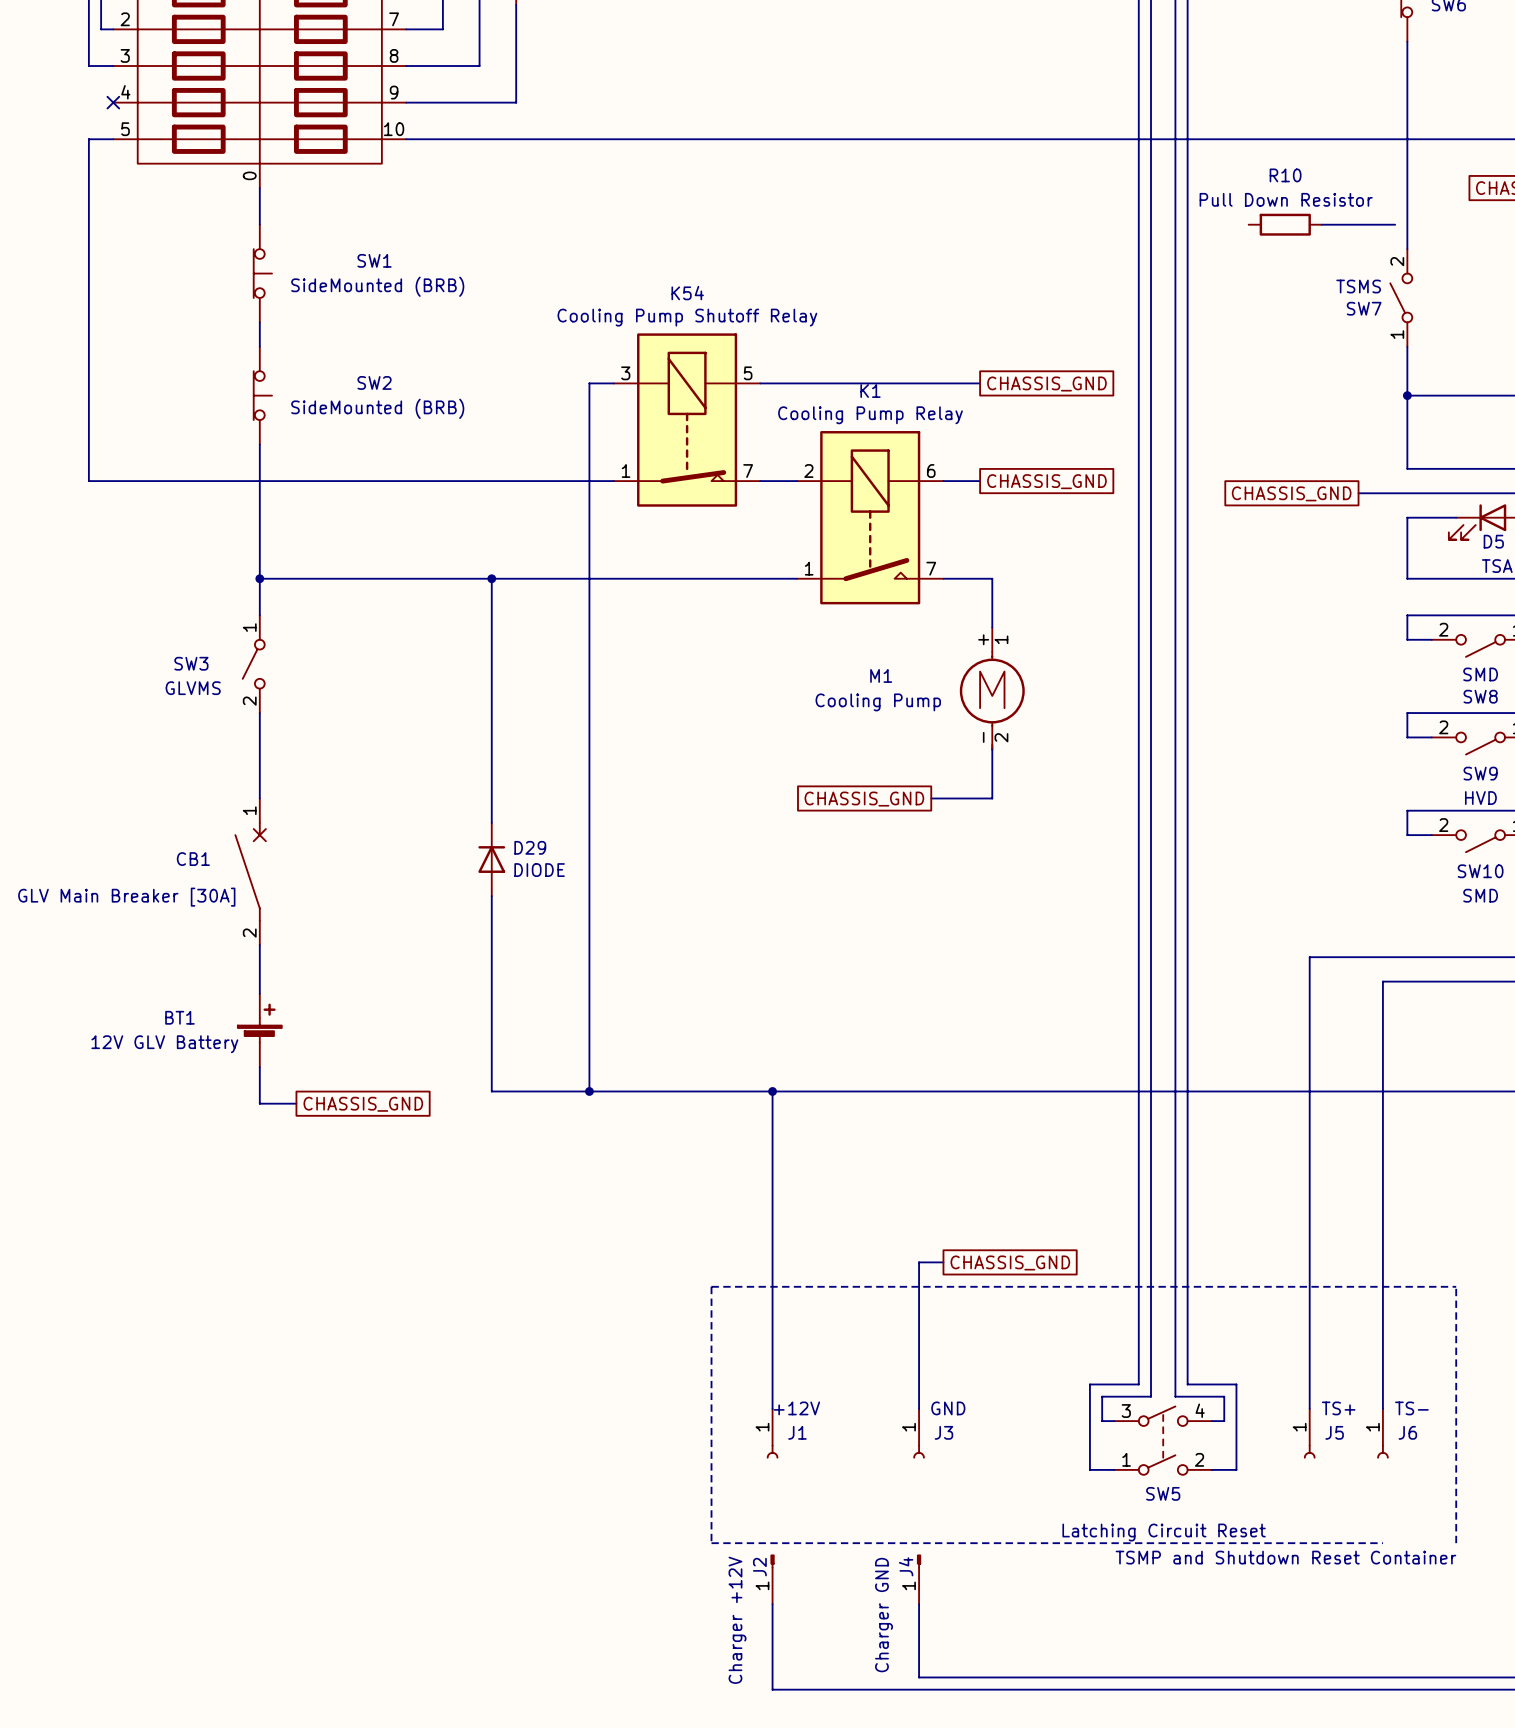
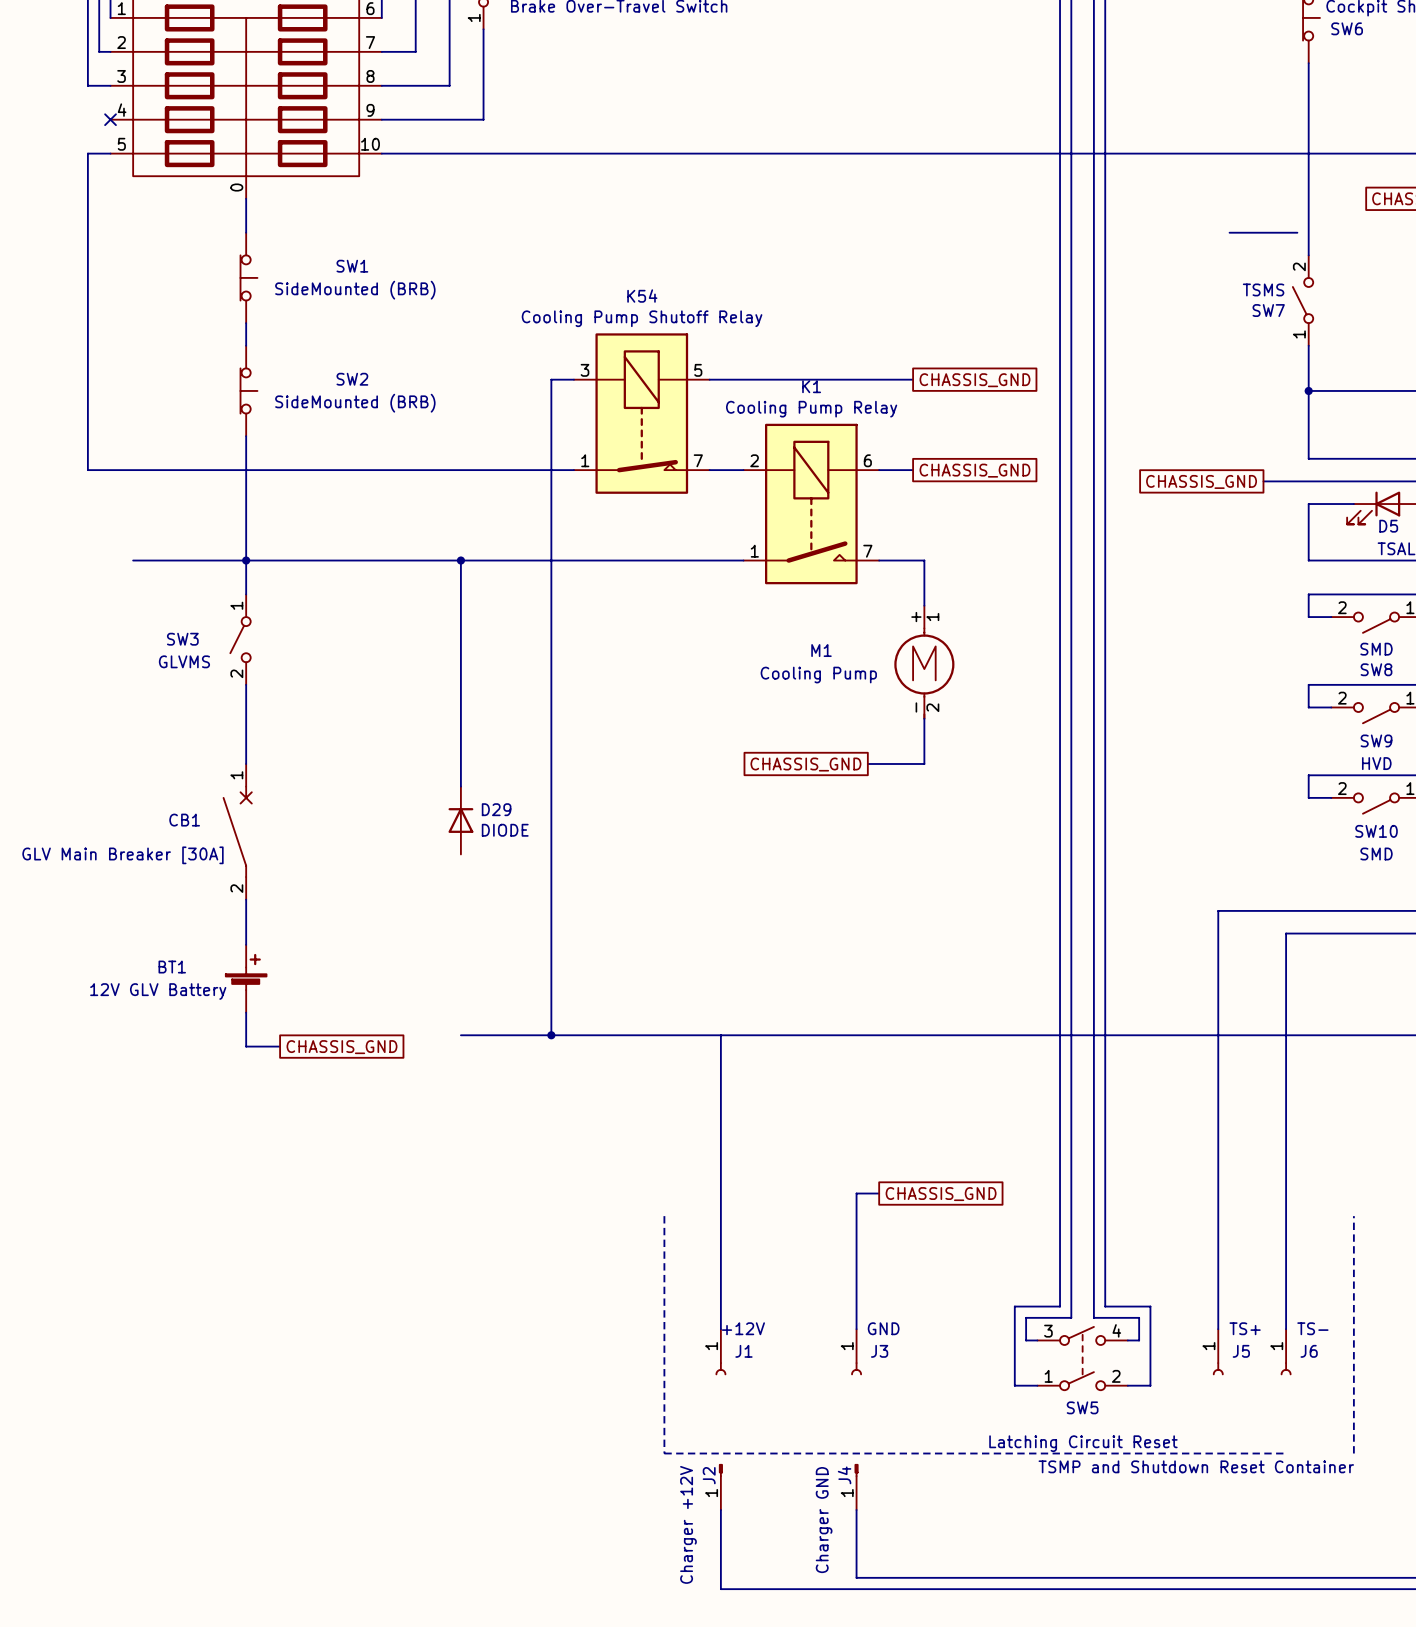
R10: Pull Down Resistor (1285, 224) -> none
wire: none -> (133, 560) (246, 560)
wire: (491, 896) (491, 1091) -> none
junction: (772, 1091) -> none
line: (711, 1286) (1456, 1286) -> none

